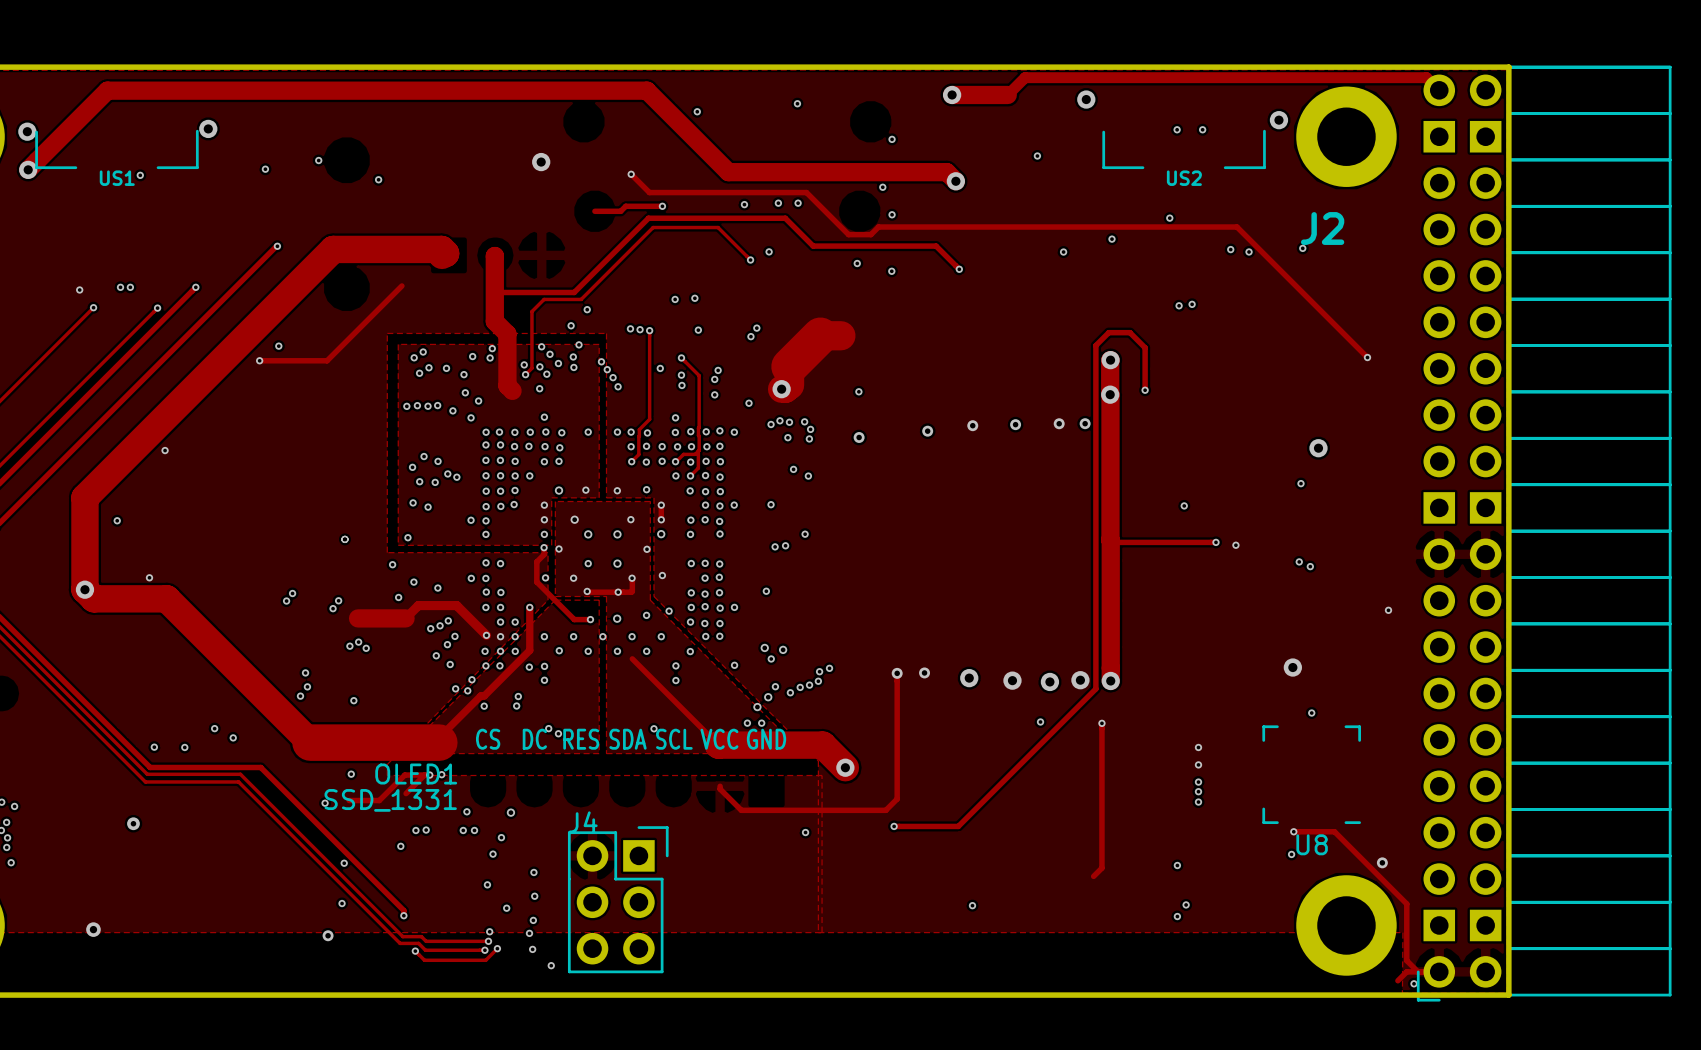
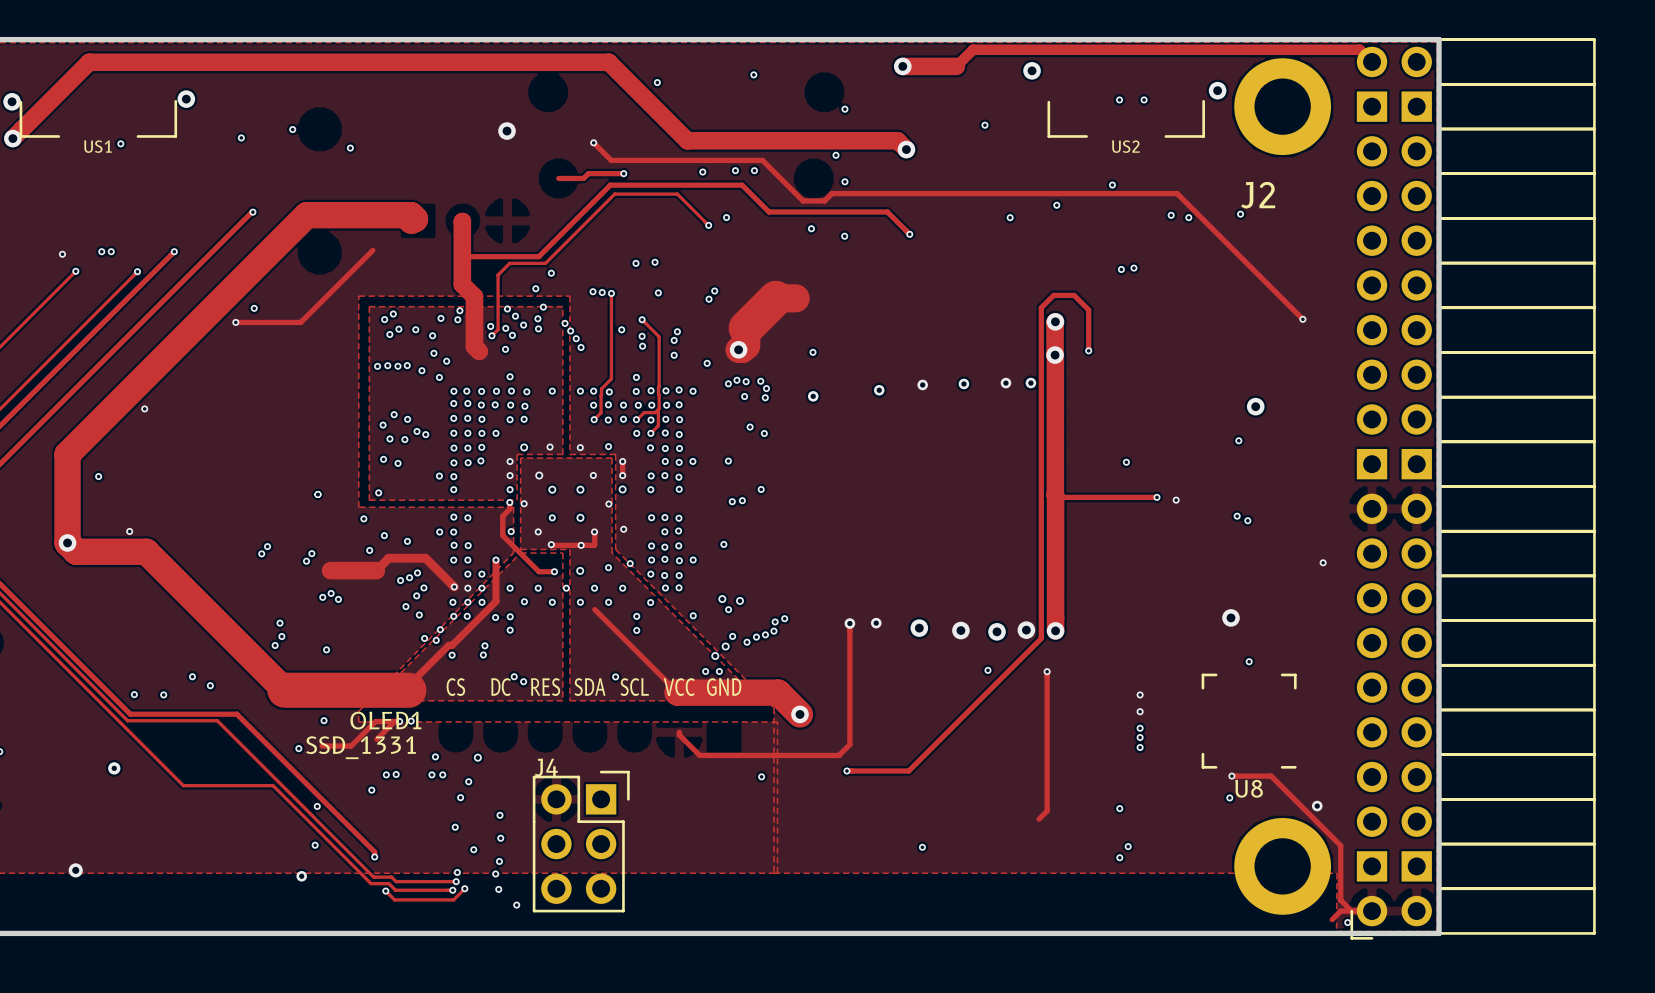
track: (145, 781) (238, 781) (298, 841) -> (125, 728) (183, 785) (273, 785)

